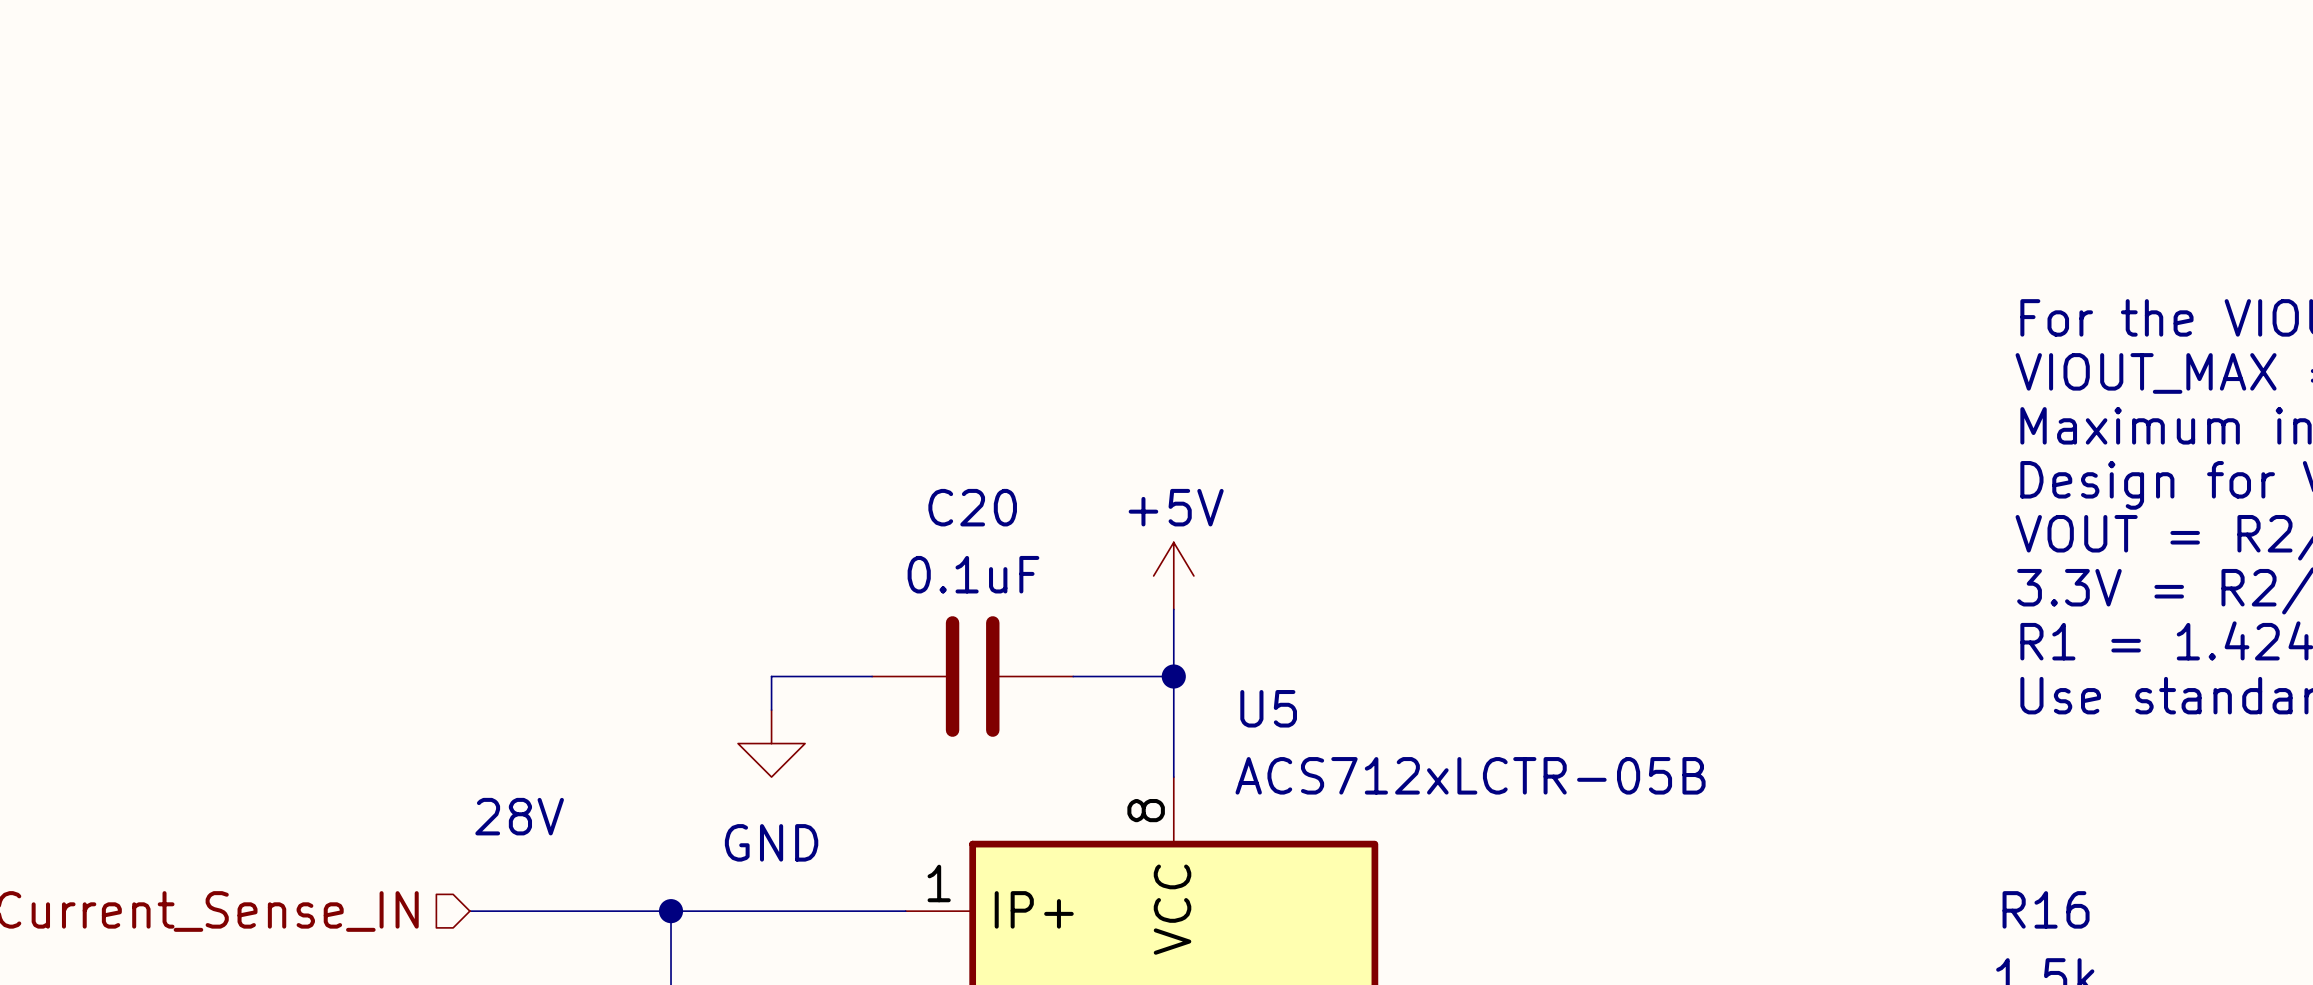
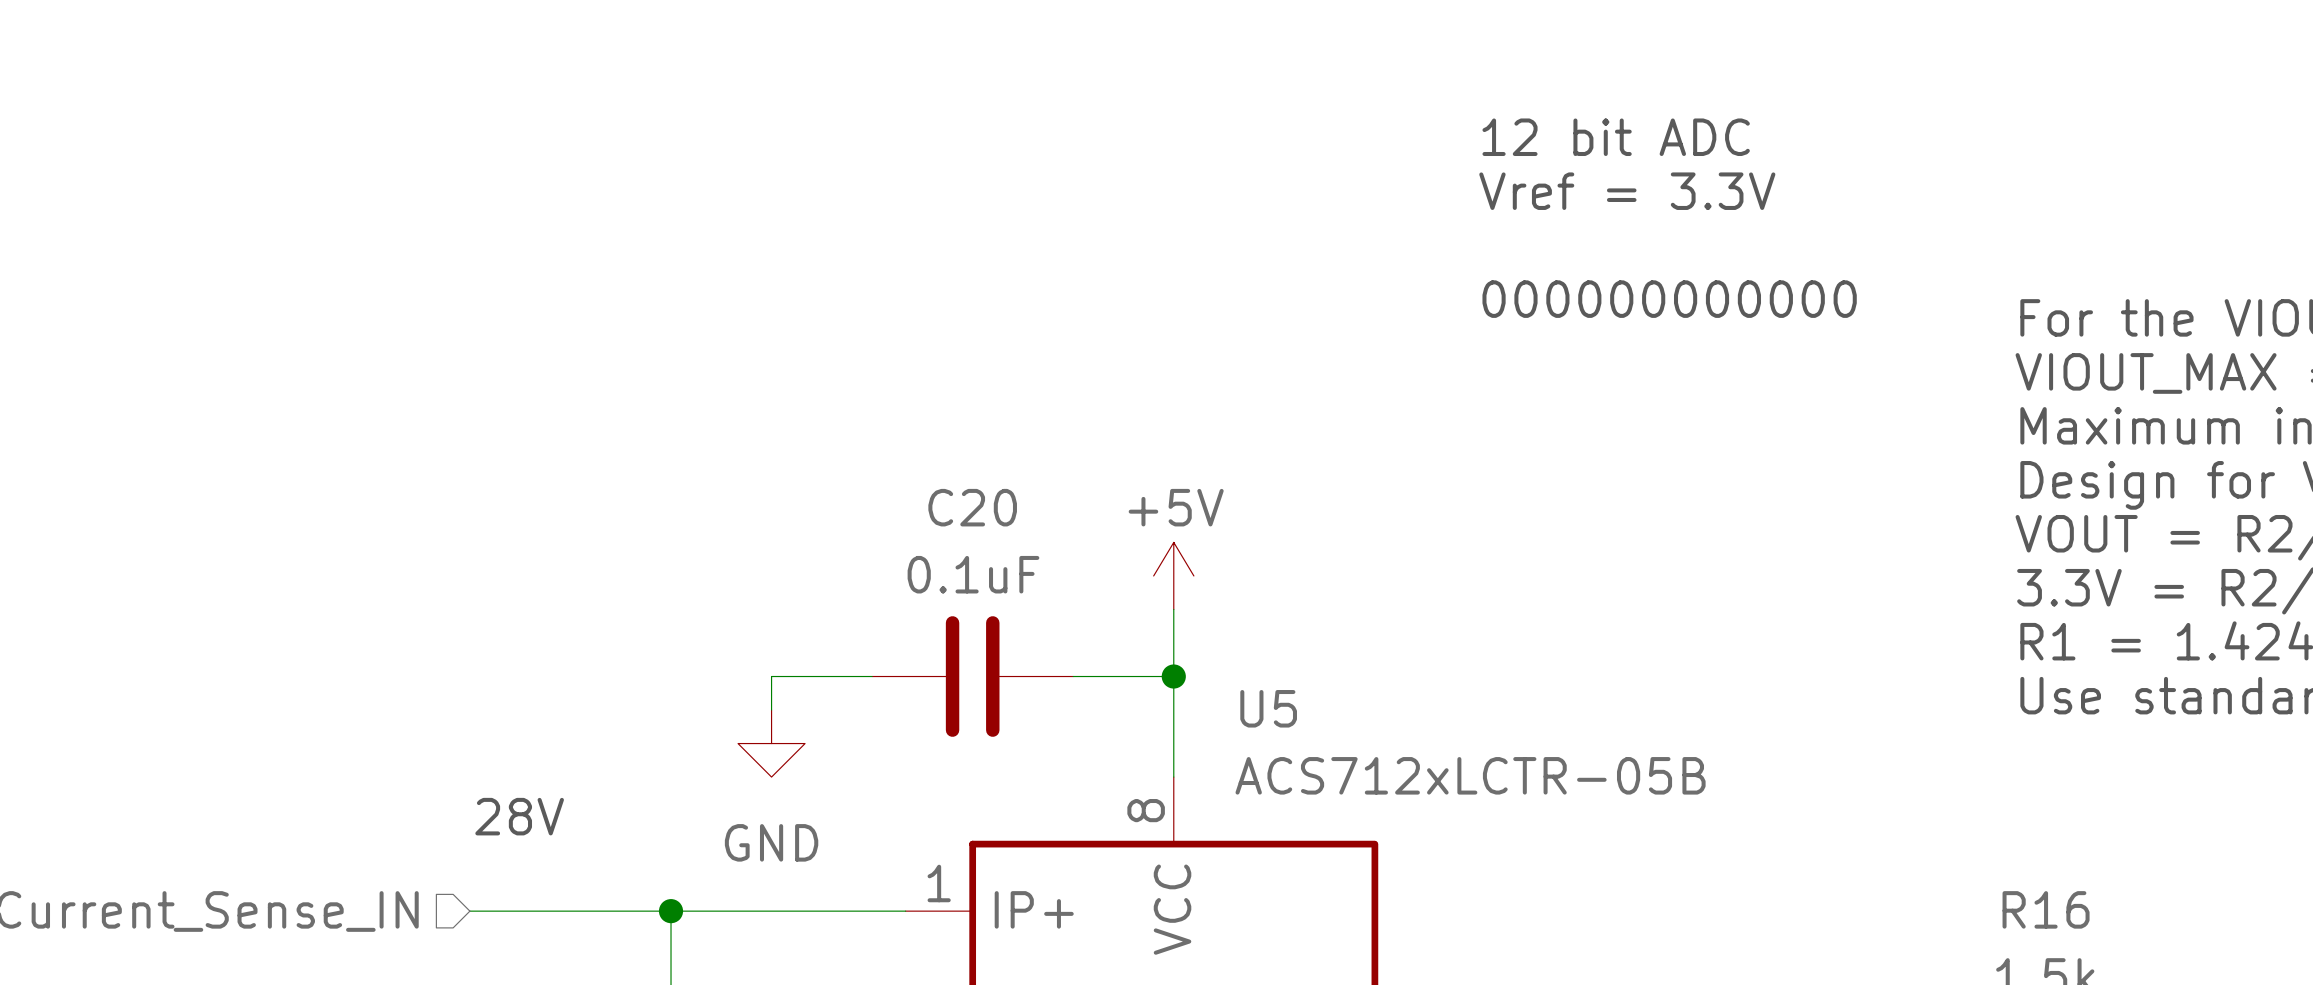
text: none -> 12 bit ADC (1616, 137)
text: none -> Vref = 3.3V (1627, 191)
text: none -> 000000000000 (1669, 299)

